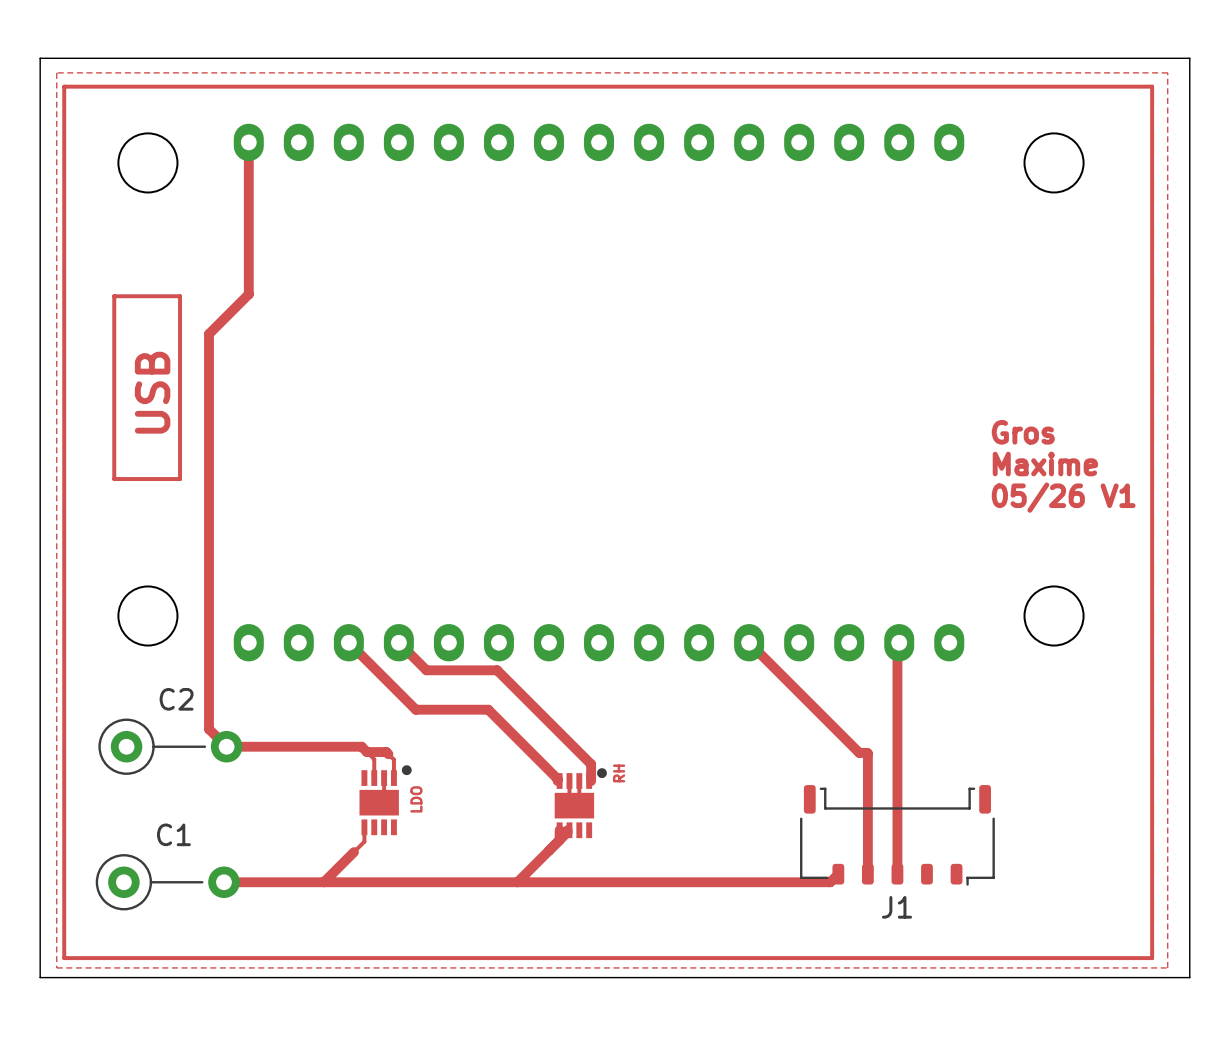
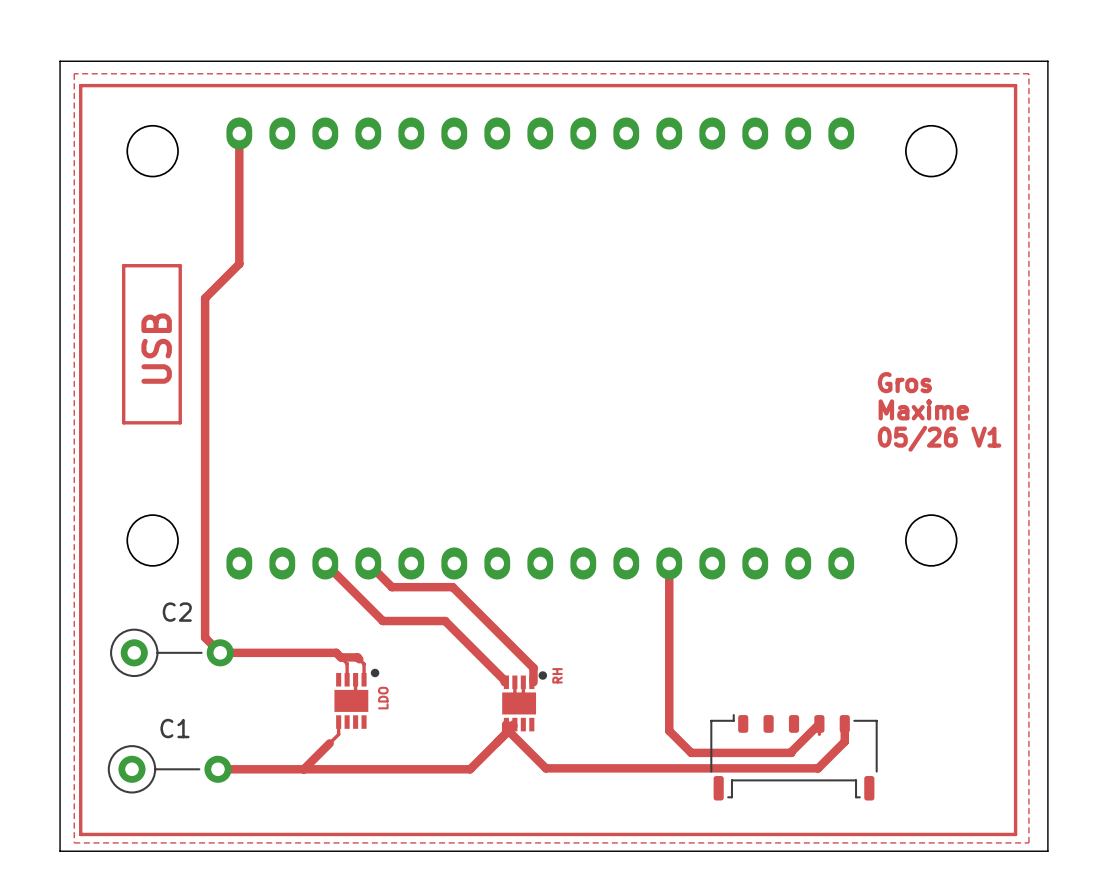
top track: (749, 642) (859, 752) (867, 753) (867, 874) -> (669, 563) (669, 730) (691, 752) (791, 752) (819, 723) (819, 734)
top track: (897, 644) (897, 874) -> none
top track: none -> (844, 723) (844, 741) (818, 768) (545, 768) (506, 728)
J1: (897, 835) -> none
part: none -> (794, 757)
top track: (838, 874) (830, 882) (517, 882) -> none

